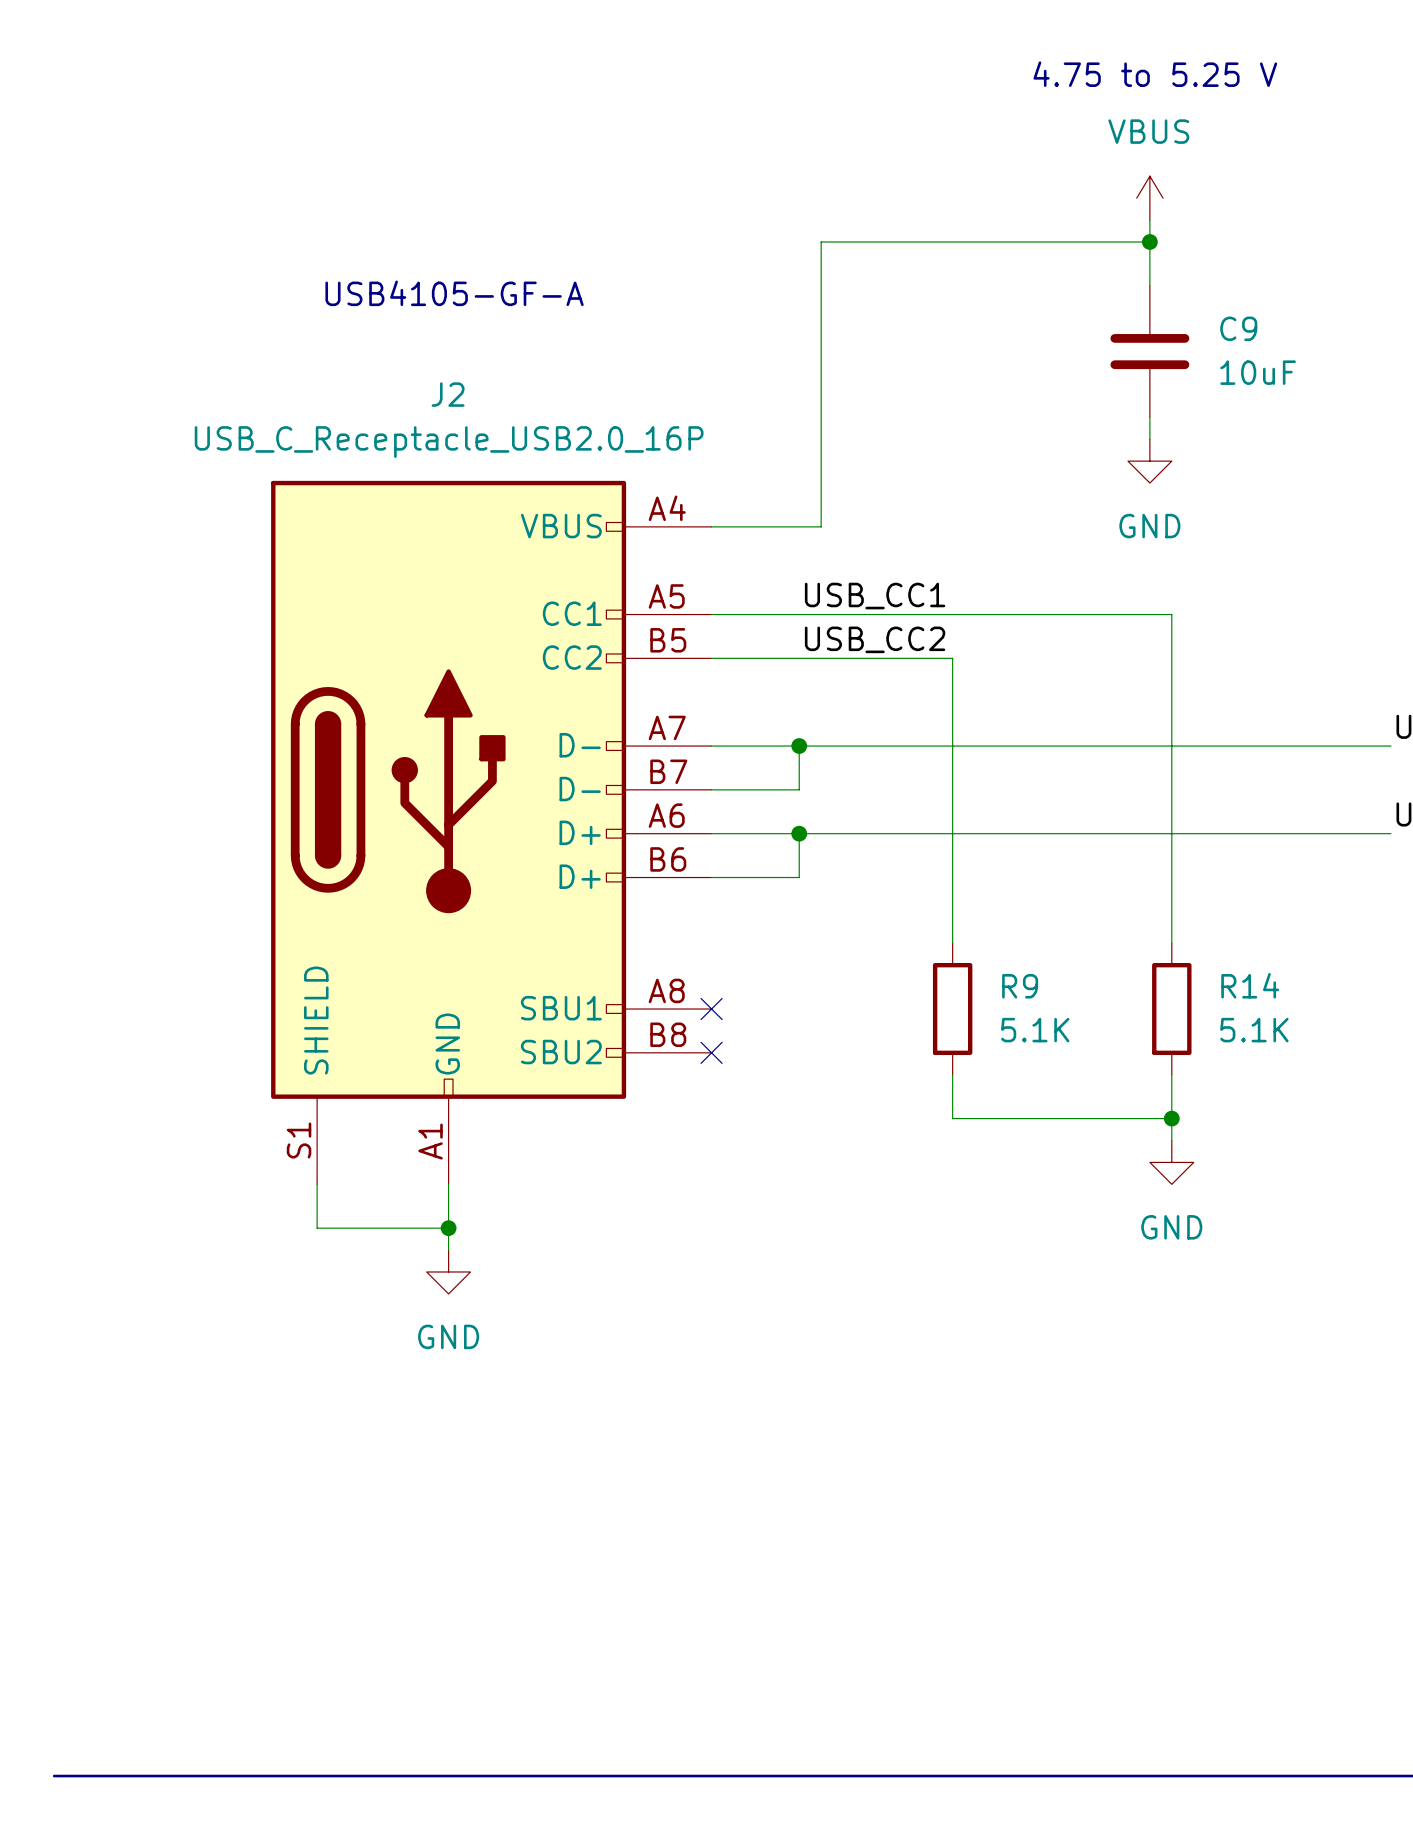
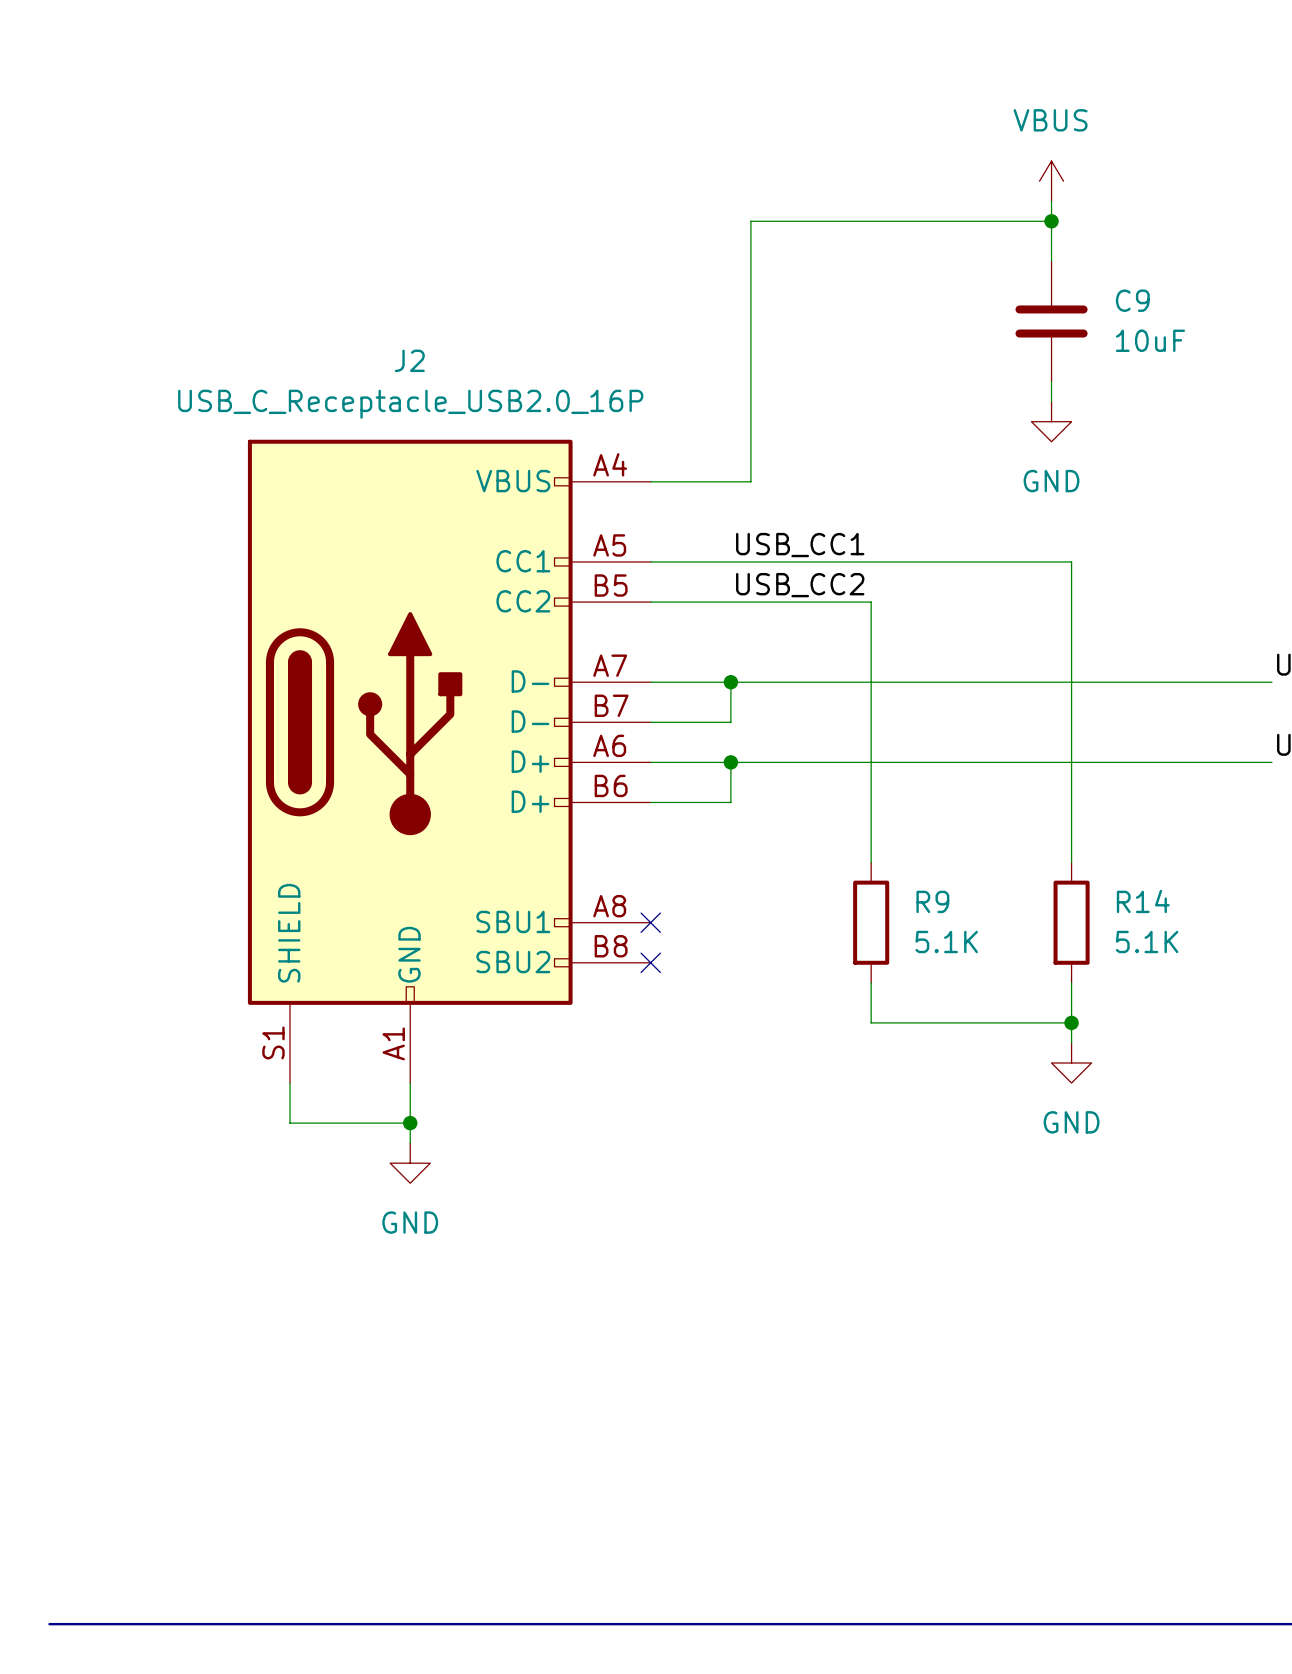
text: 4.75 to 5.25 V (1155, 74) -> none
text: USB4105-GF-A (454, 293) -> none

